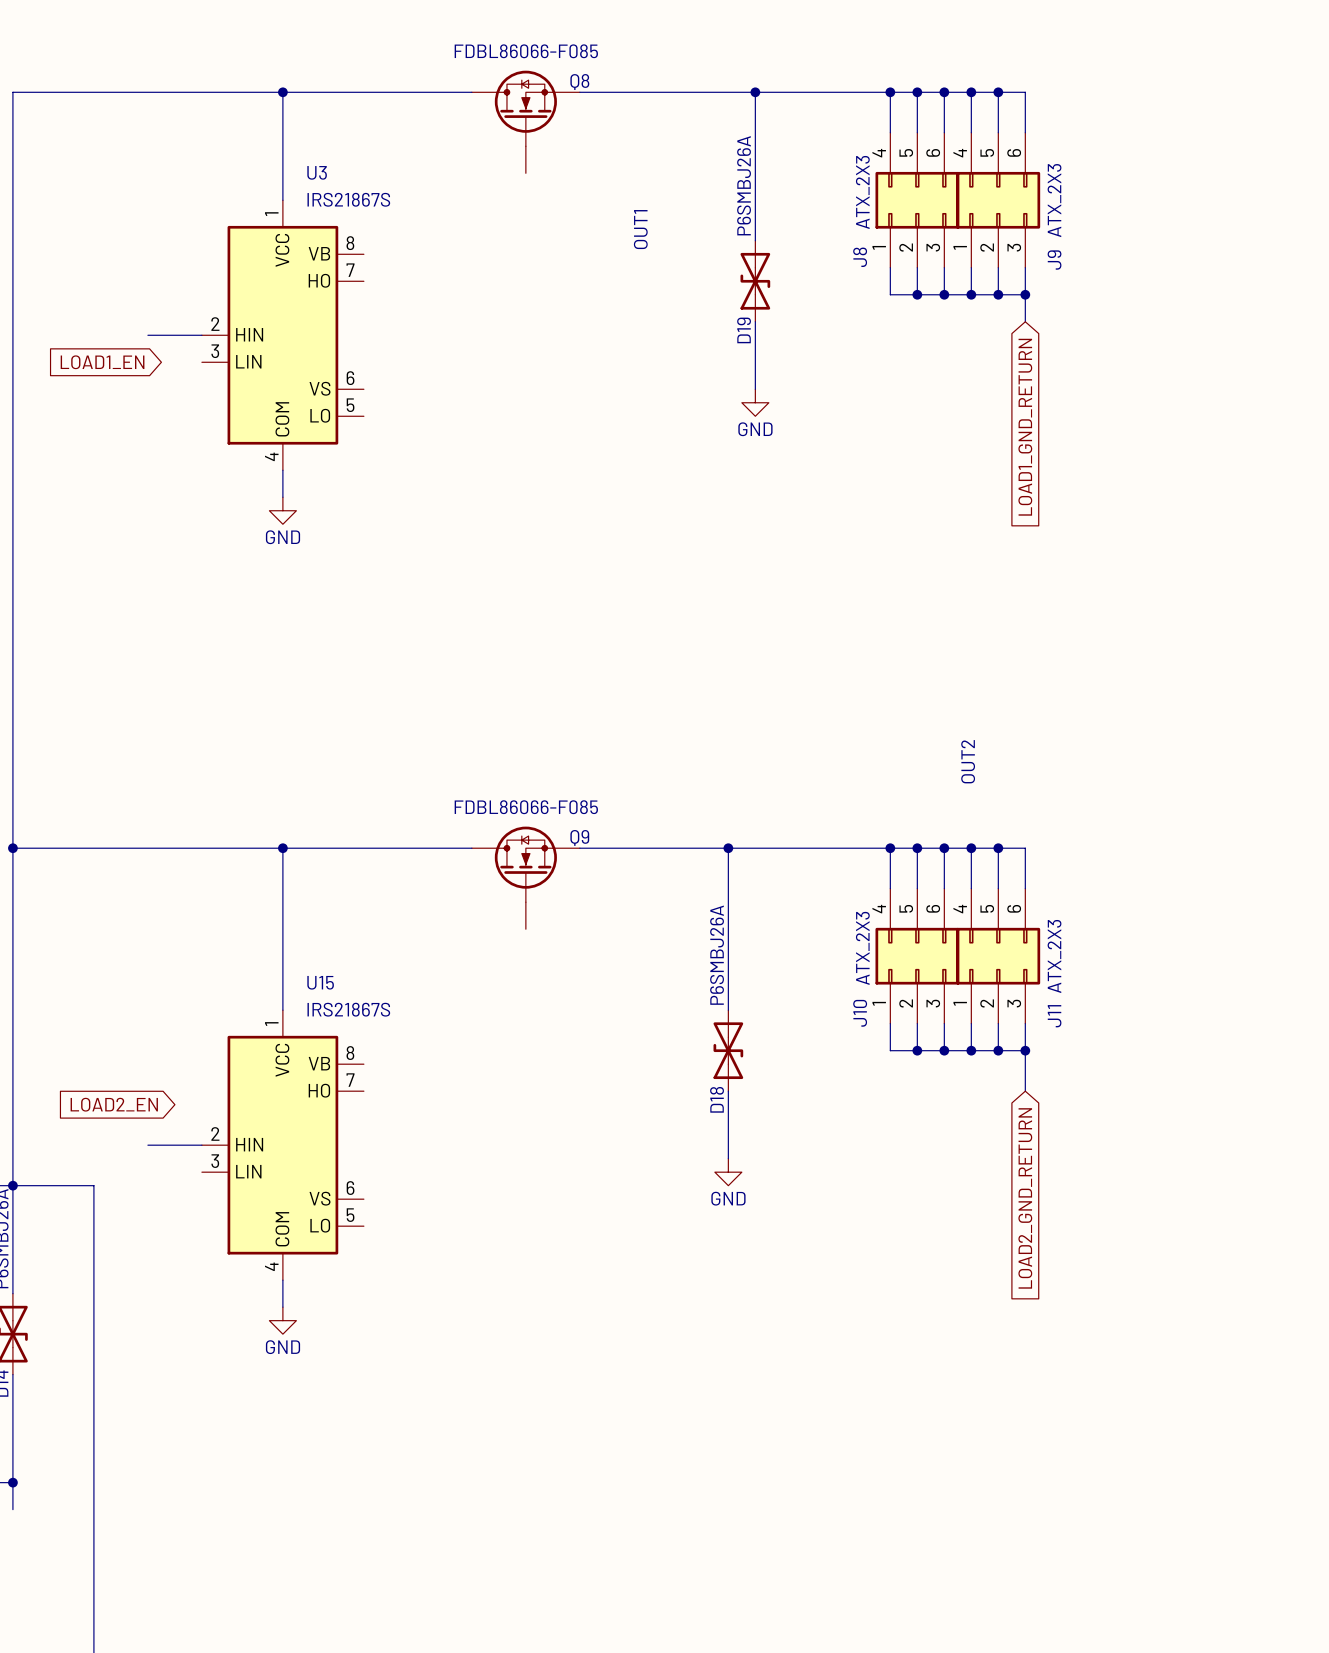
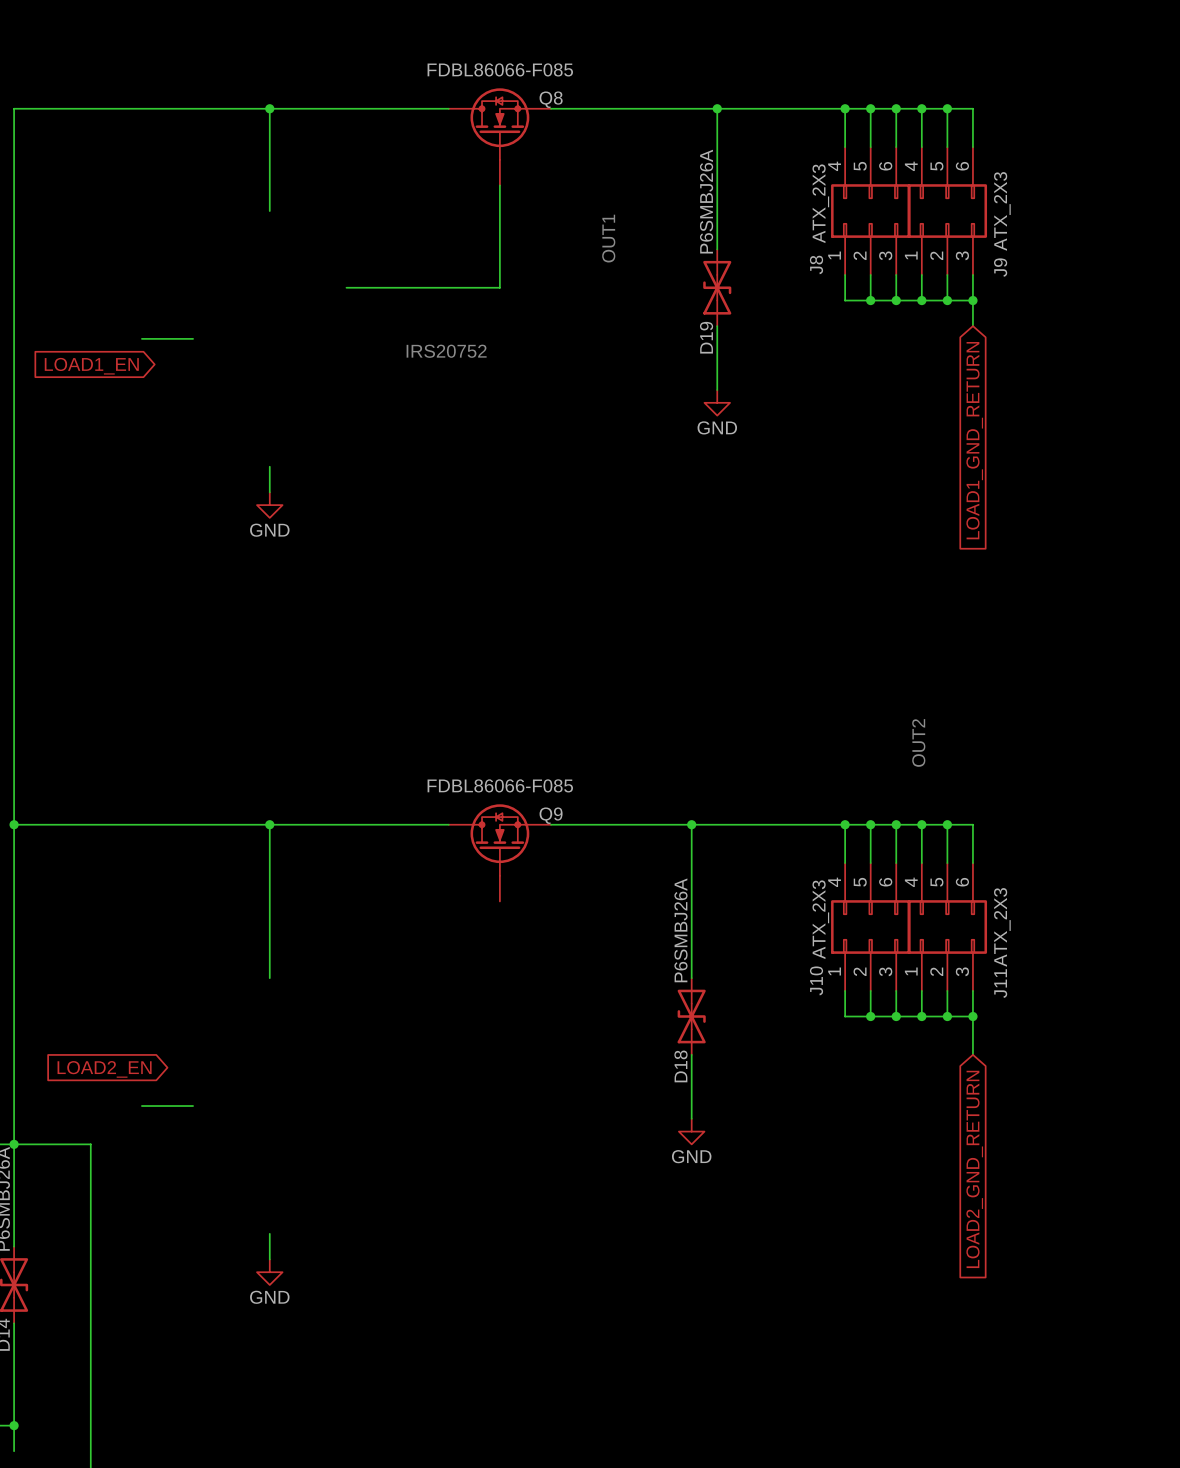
wire: none -> (499, 185) (499, 287) (346, 287)
U3: IRS21867S (282, 335) -> none
text: none -> IRS20752 (446, 351)
U15: IRS21867S (282, 1145) -> none

